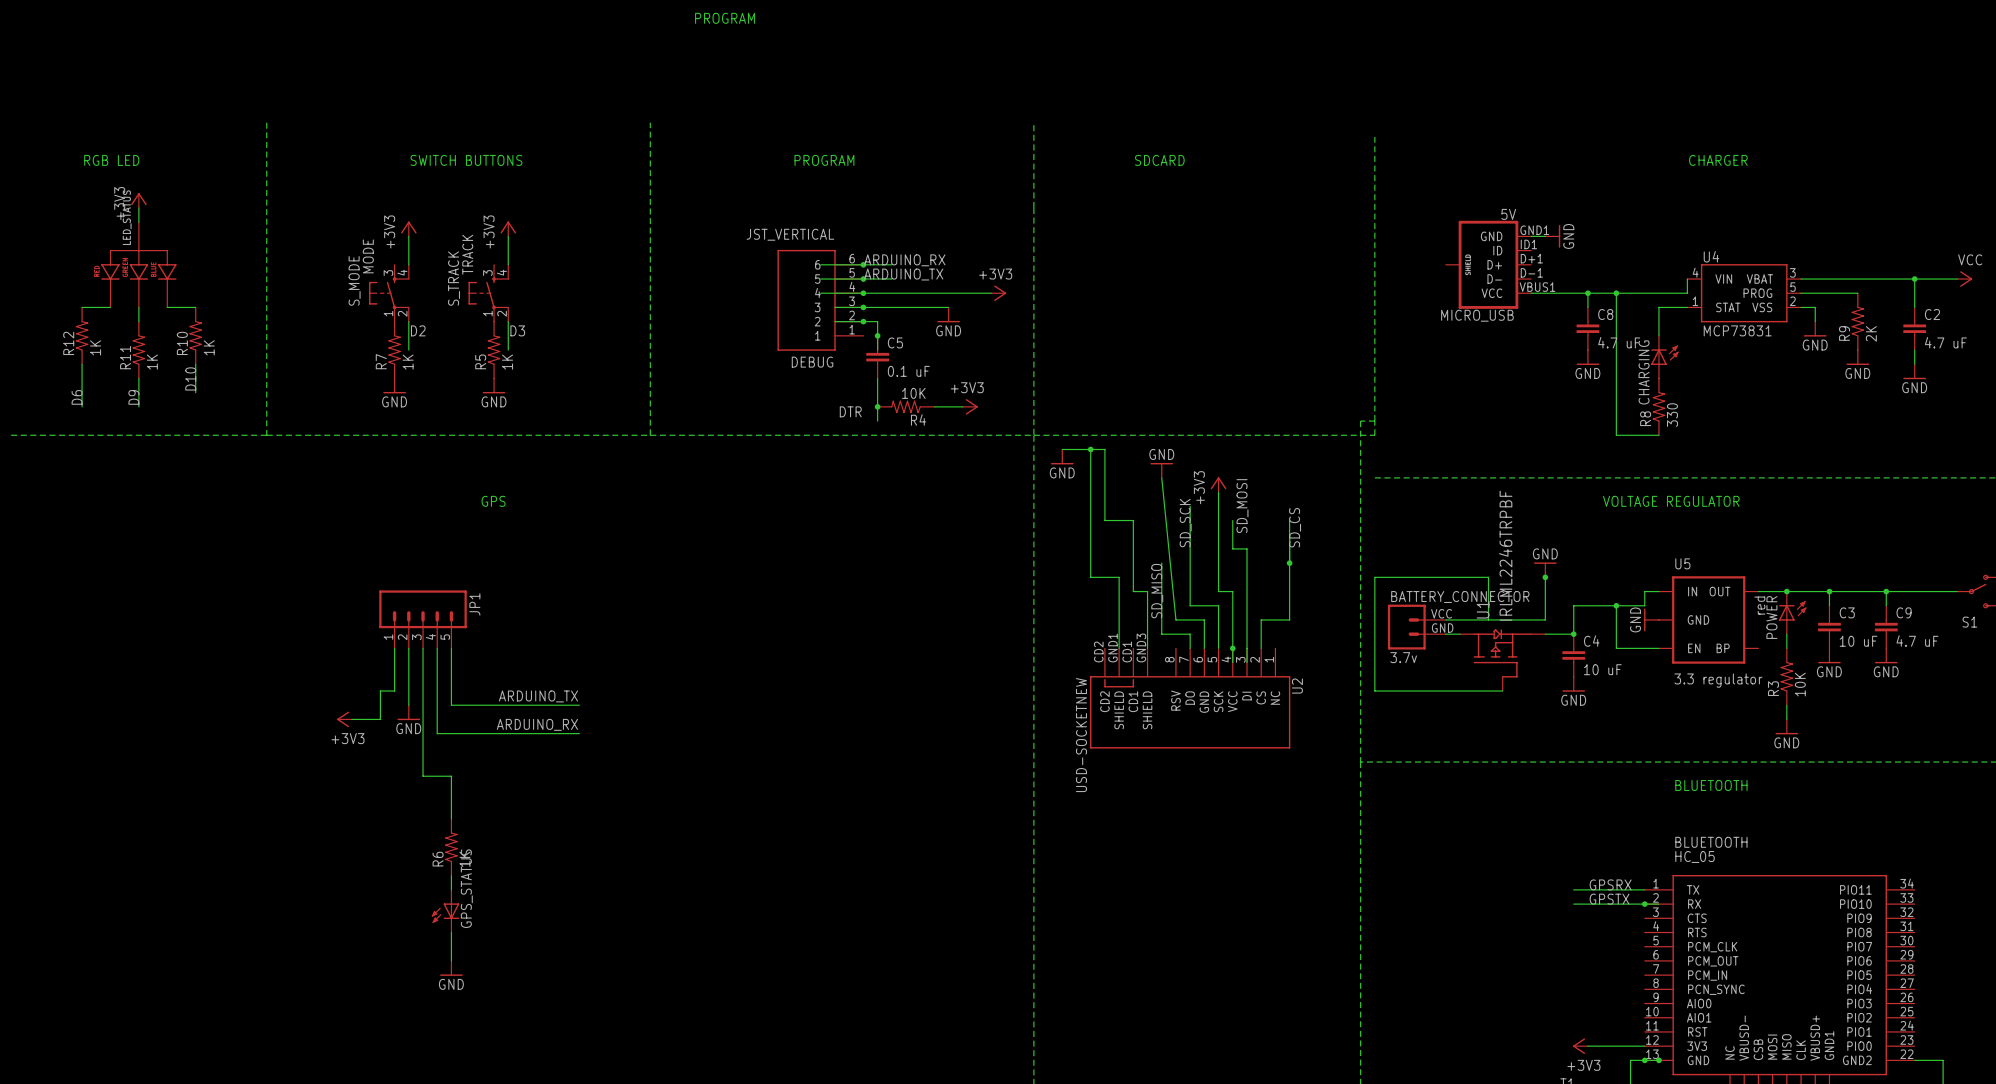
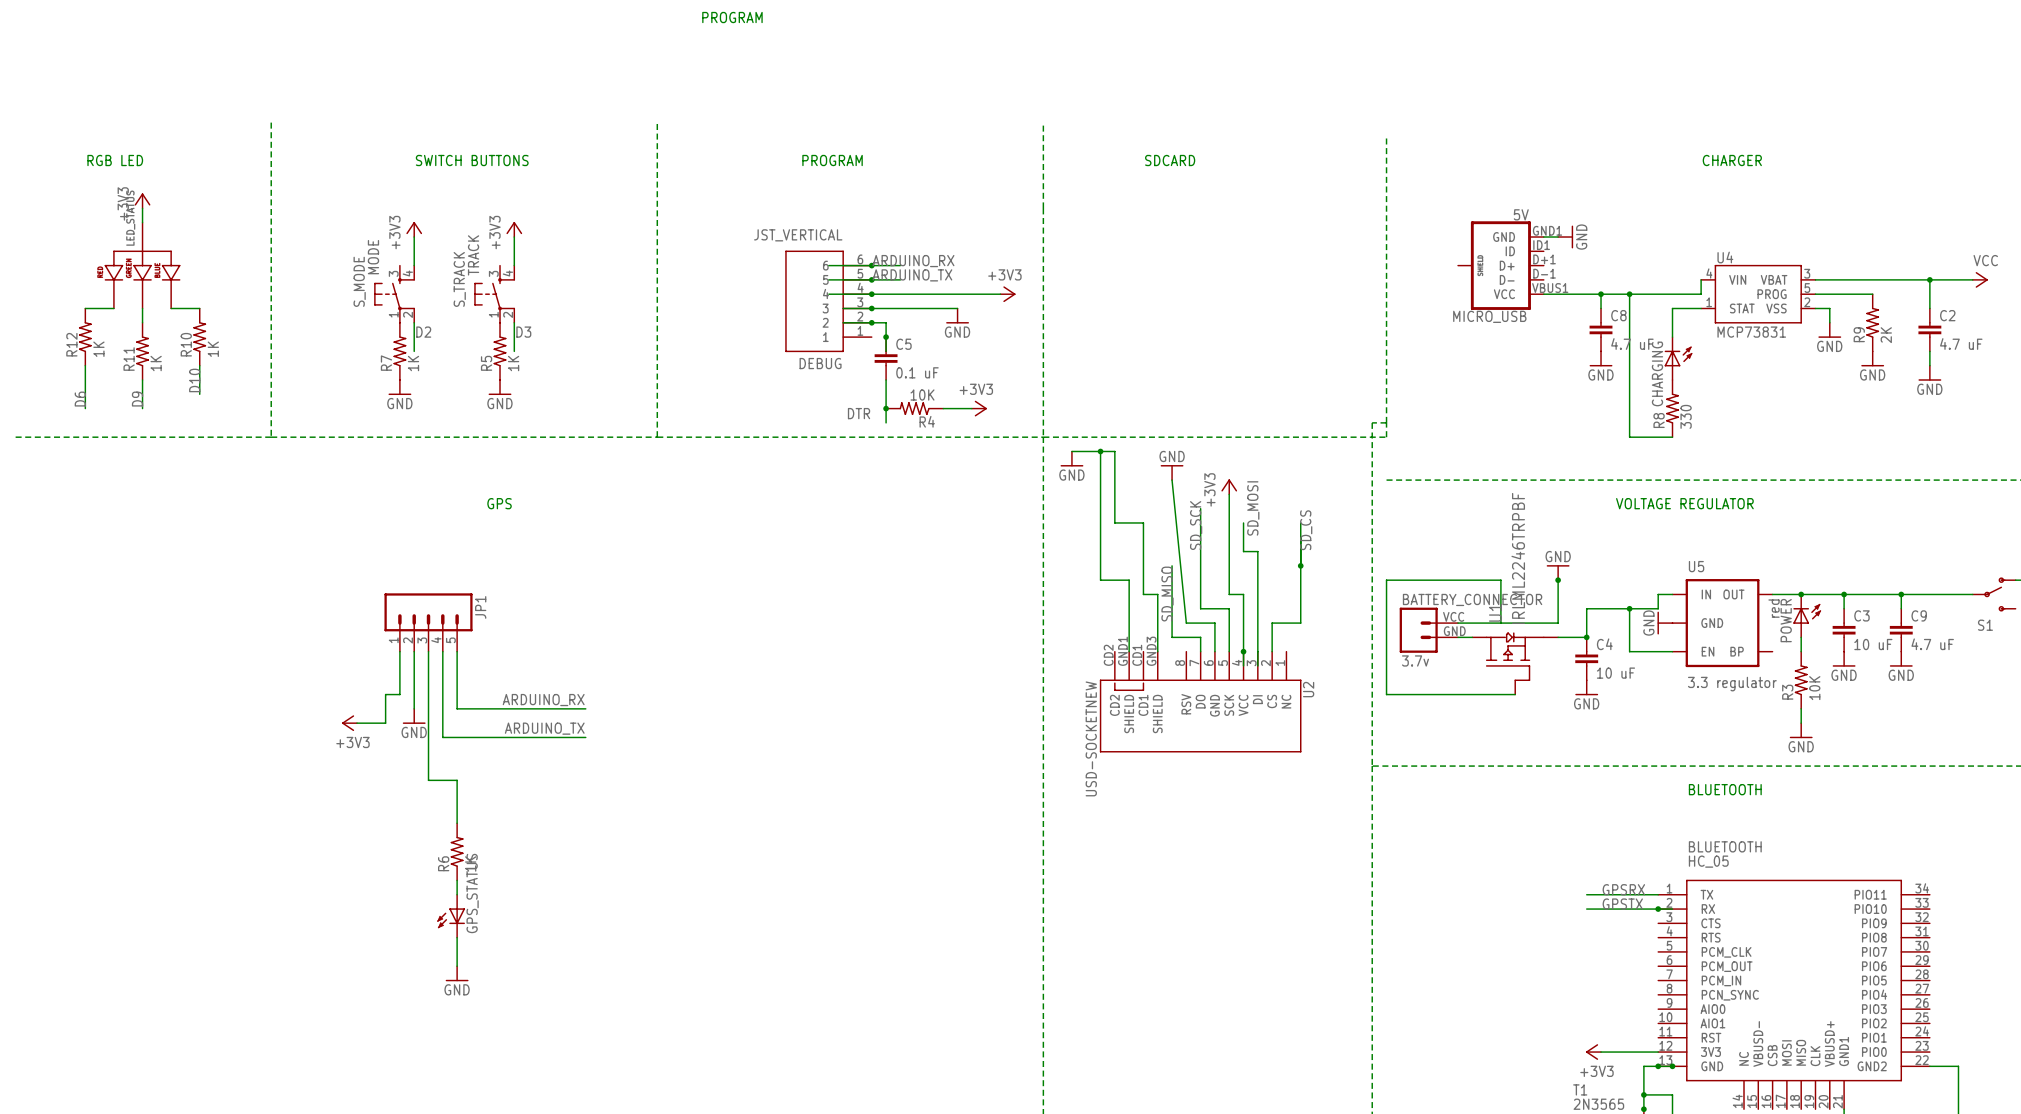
label: ARDUINO_TX (538, 696) -> ARDUINO_RX (543, 700)
label: ARDUINO_RX (537, 724) -> ARDUINO_TX (544, 728)

